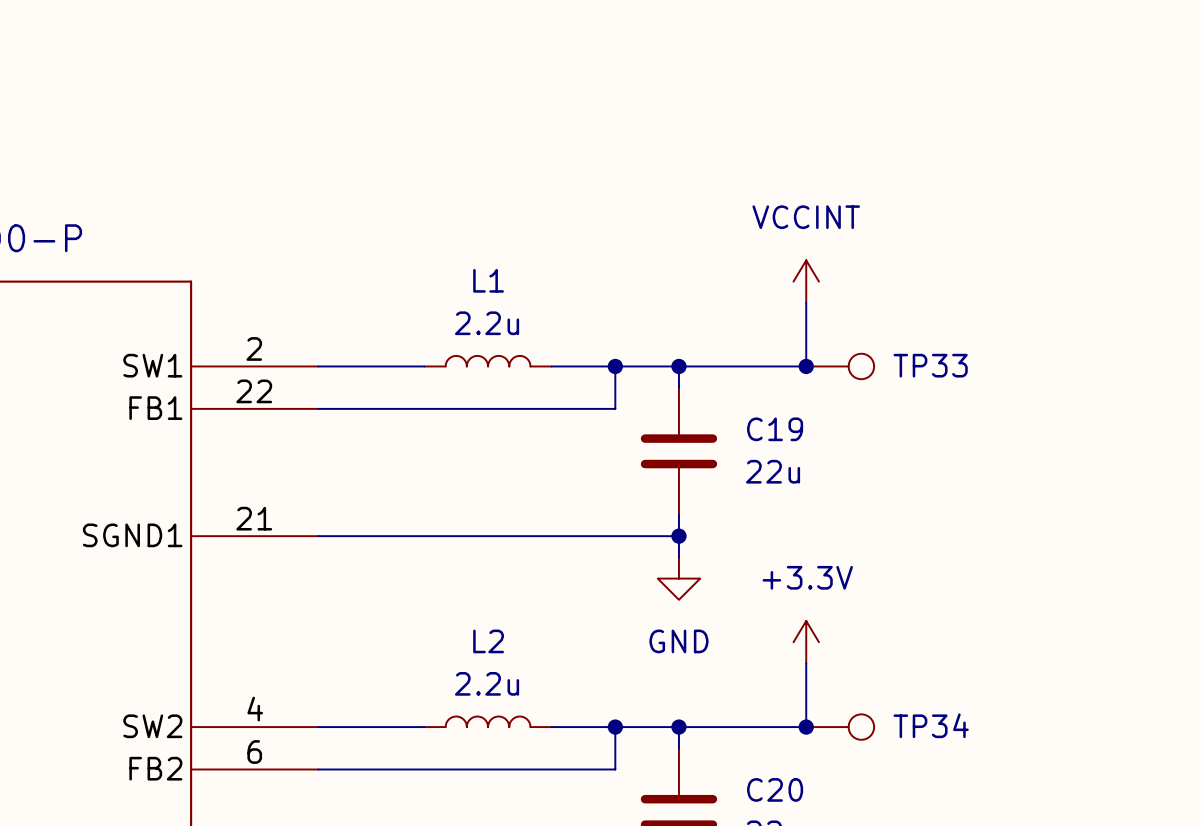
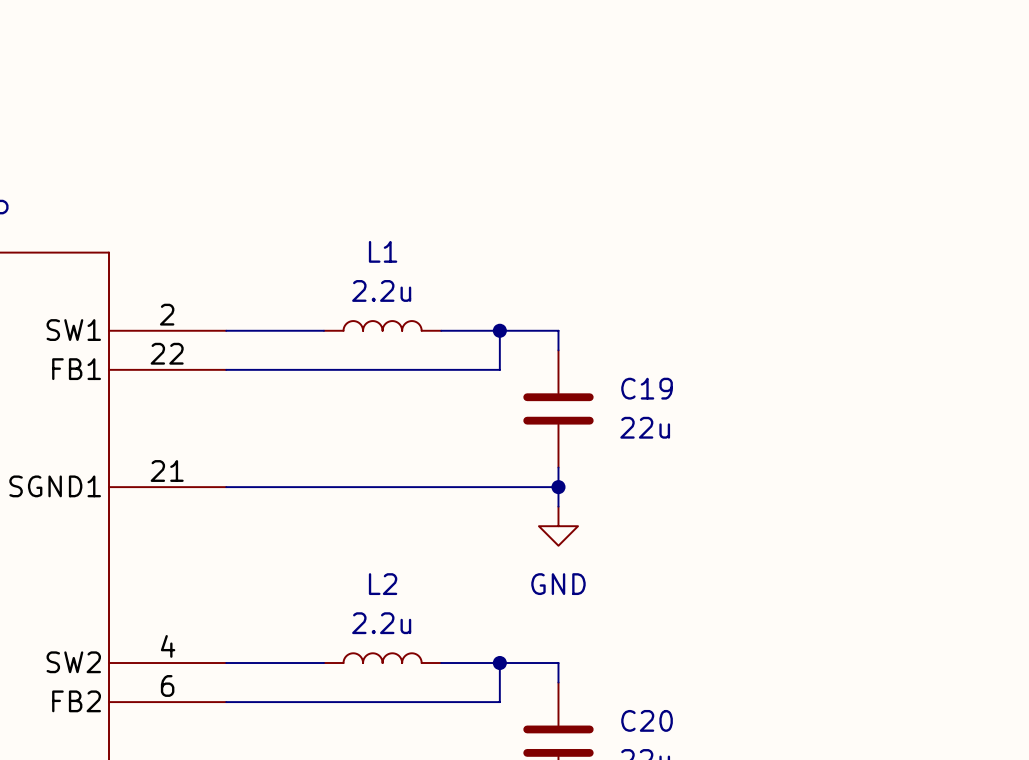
power symbol: VCCINT (806, 281) -> none
wire: (806, 302) (806, 366) (678, 366) -> none
junction: (678, 366) -> none
junction: (806, 366) -> none
TP33: (840, 366) -> none
power symbol: +3.3V (806, 642) -> none
wire: (806, 663) (806, 727) (678, 727) -> none
junction: (678, 727) -> none
junction: (806, 727) -> none
TP34: (840, 727) -> none

